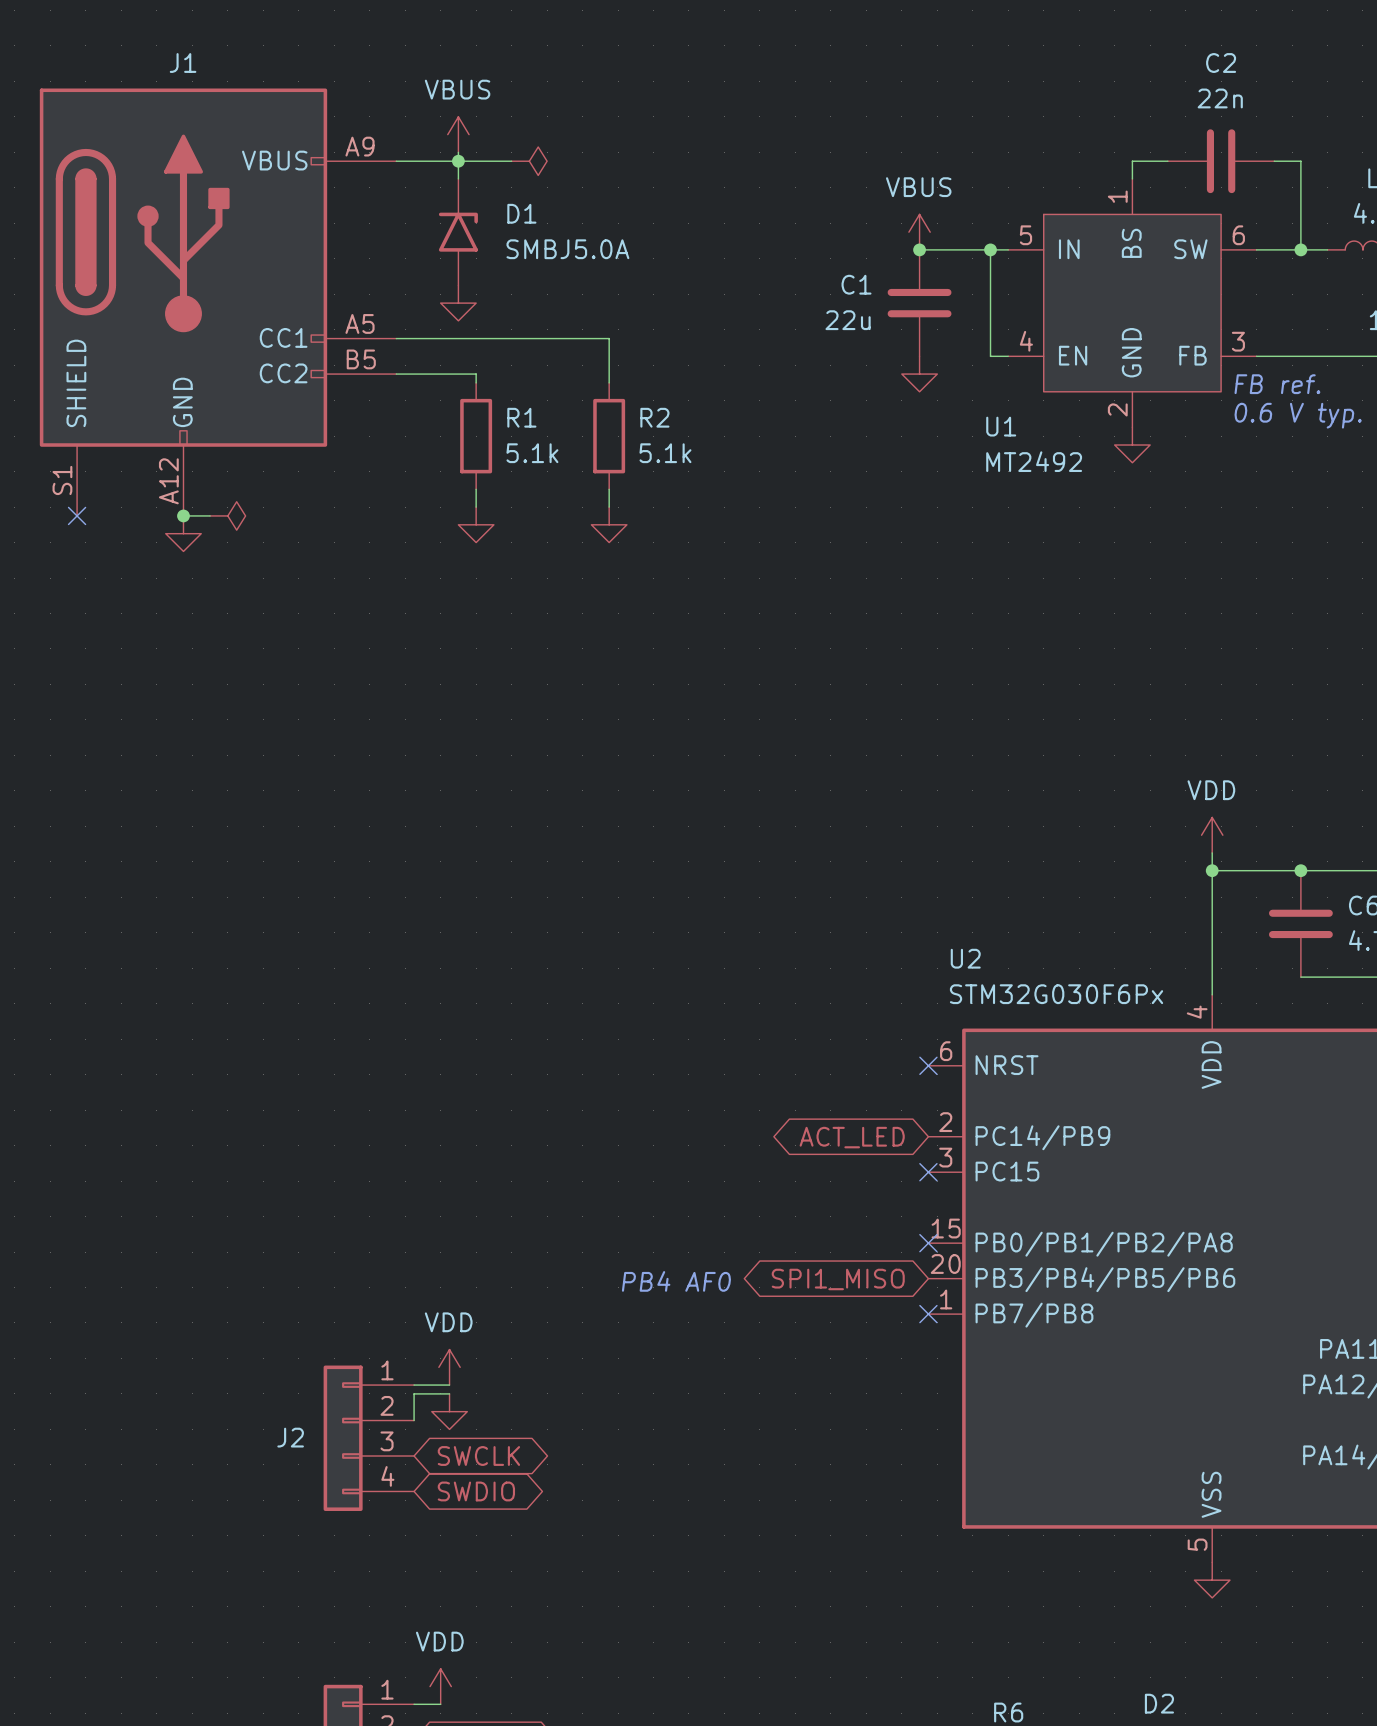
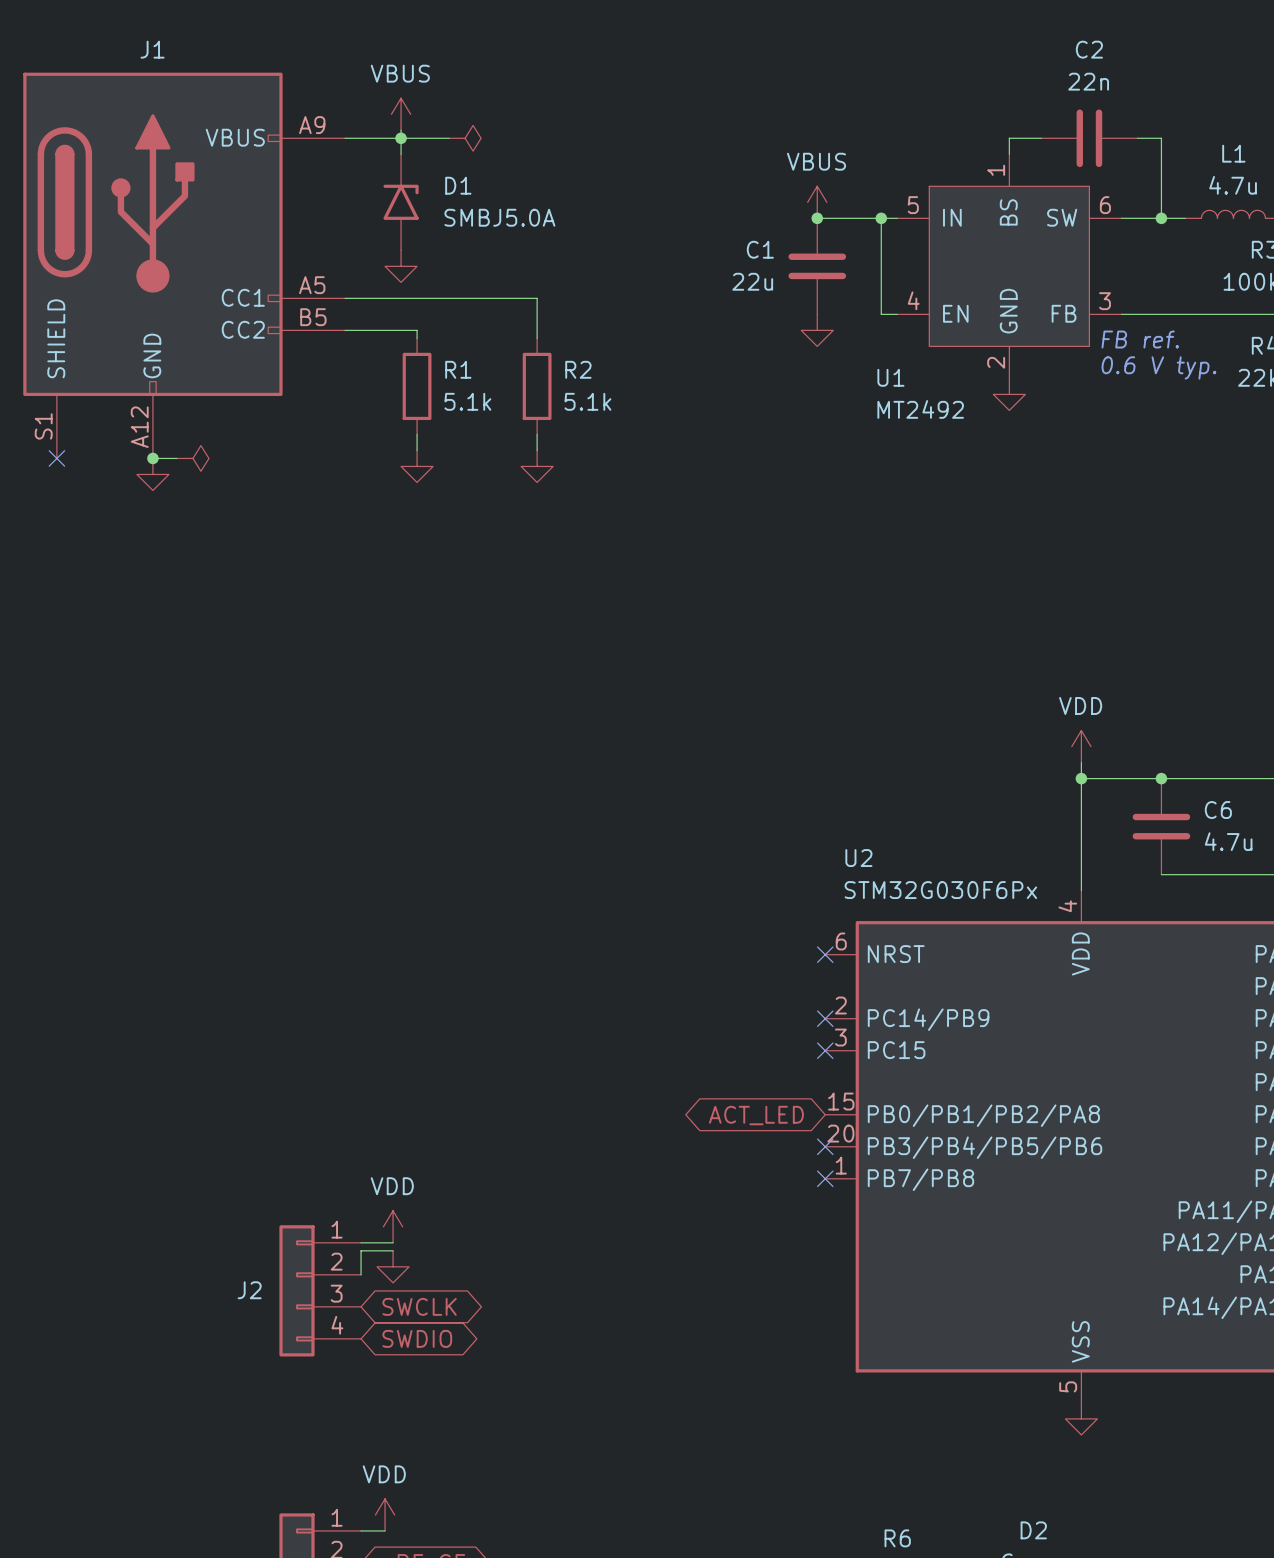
no-connect mark: none -> (825, 1018)
global label position: ACT_LED (852, 1137) -> ACT_LED (756, 1115)
no-connect mark position: (928, 1243) -> (825, 1146)
global label: SPI1_MISO (838, 1279) -> none
text: PB4 AF0 (676, 1281) -> none

